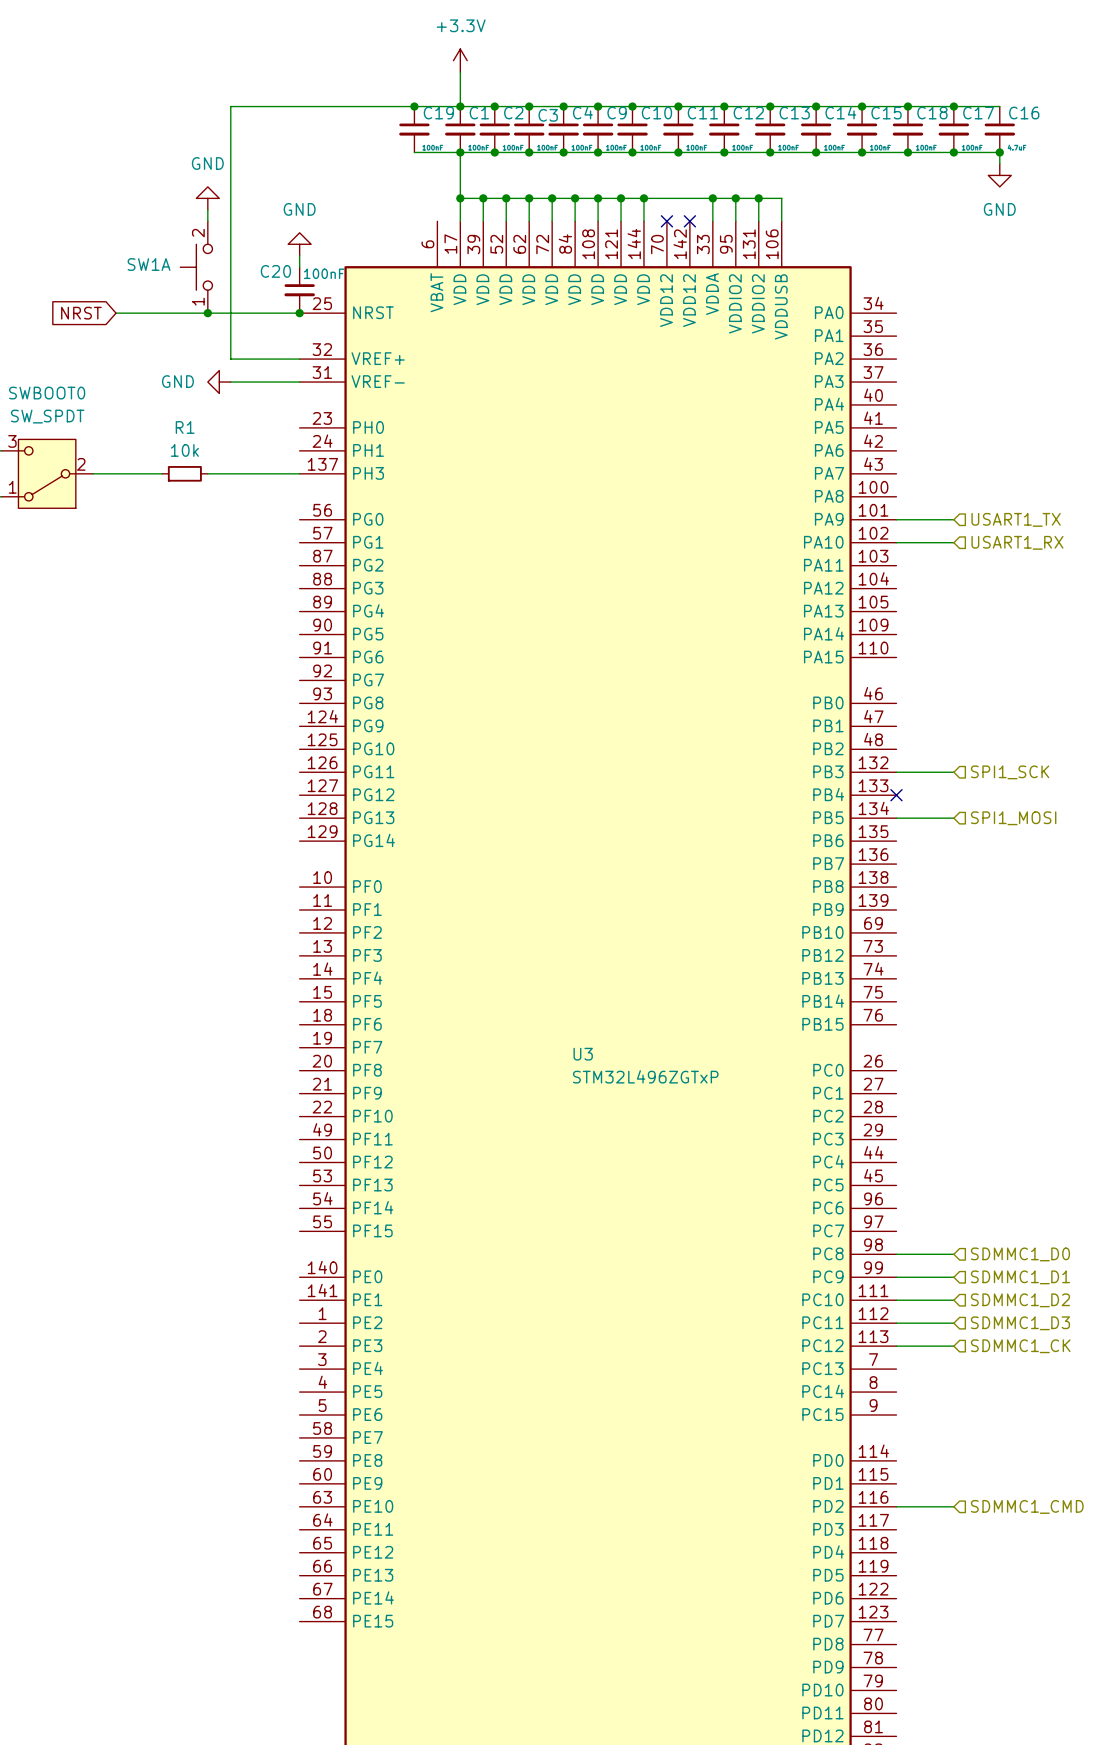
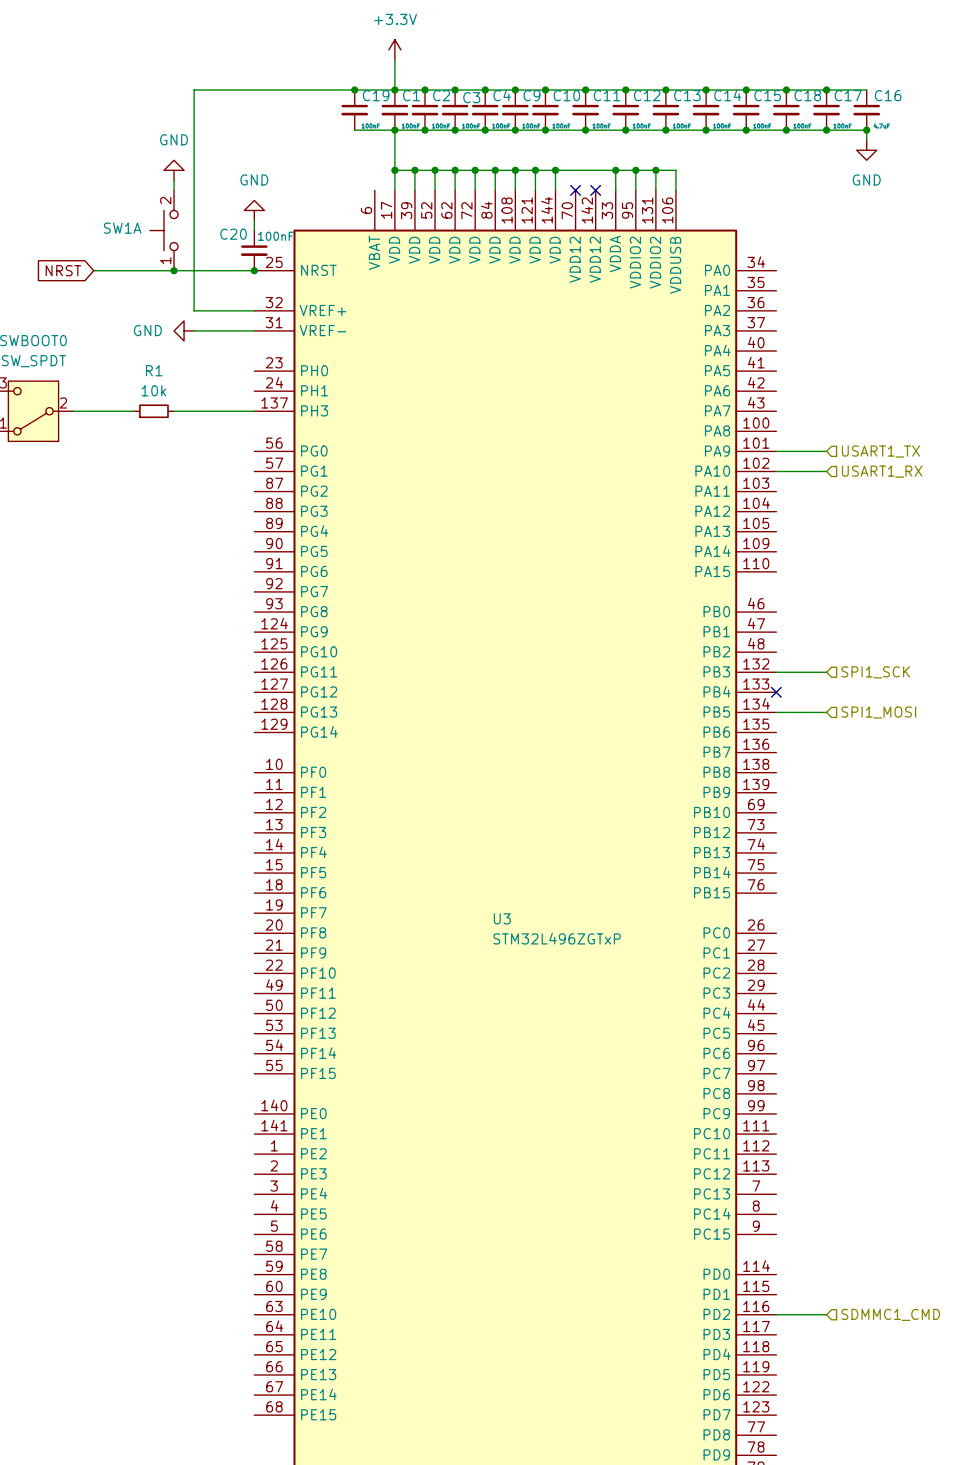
wire: (896, 1254) (953, 1254) -> none
hierarchical label: SDMMC1_D0 (1020, 1254) -> none
wire: (896, 1277) (953, 1277) -> none
hierarchical label: SDMMC1_D1 (1020, 1277) -> none
wire: (896, 1300) (953, 1300) -> none
hierarchical label: SDMMC1_D2 (1020, 1300) -> none
wire: (896, 1323) (953, 1323) -> none
hierarchical label: SDMMC1_D3 (1020, 1323) -> none
wire: (896, 1346) (953, 1346) -> none
hierarchical label: SDMMC1_CK (1020, 1346) -> none

